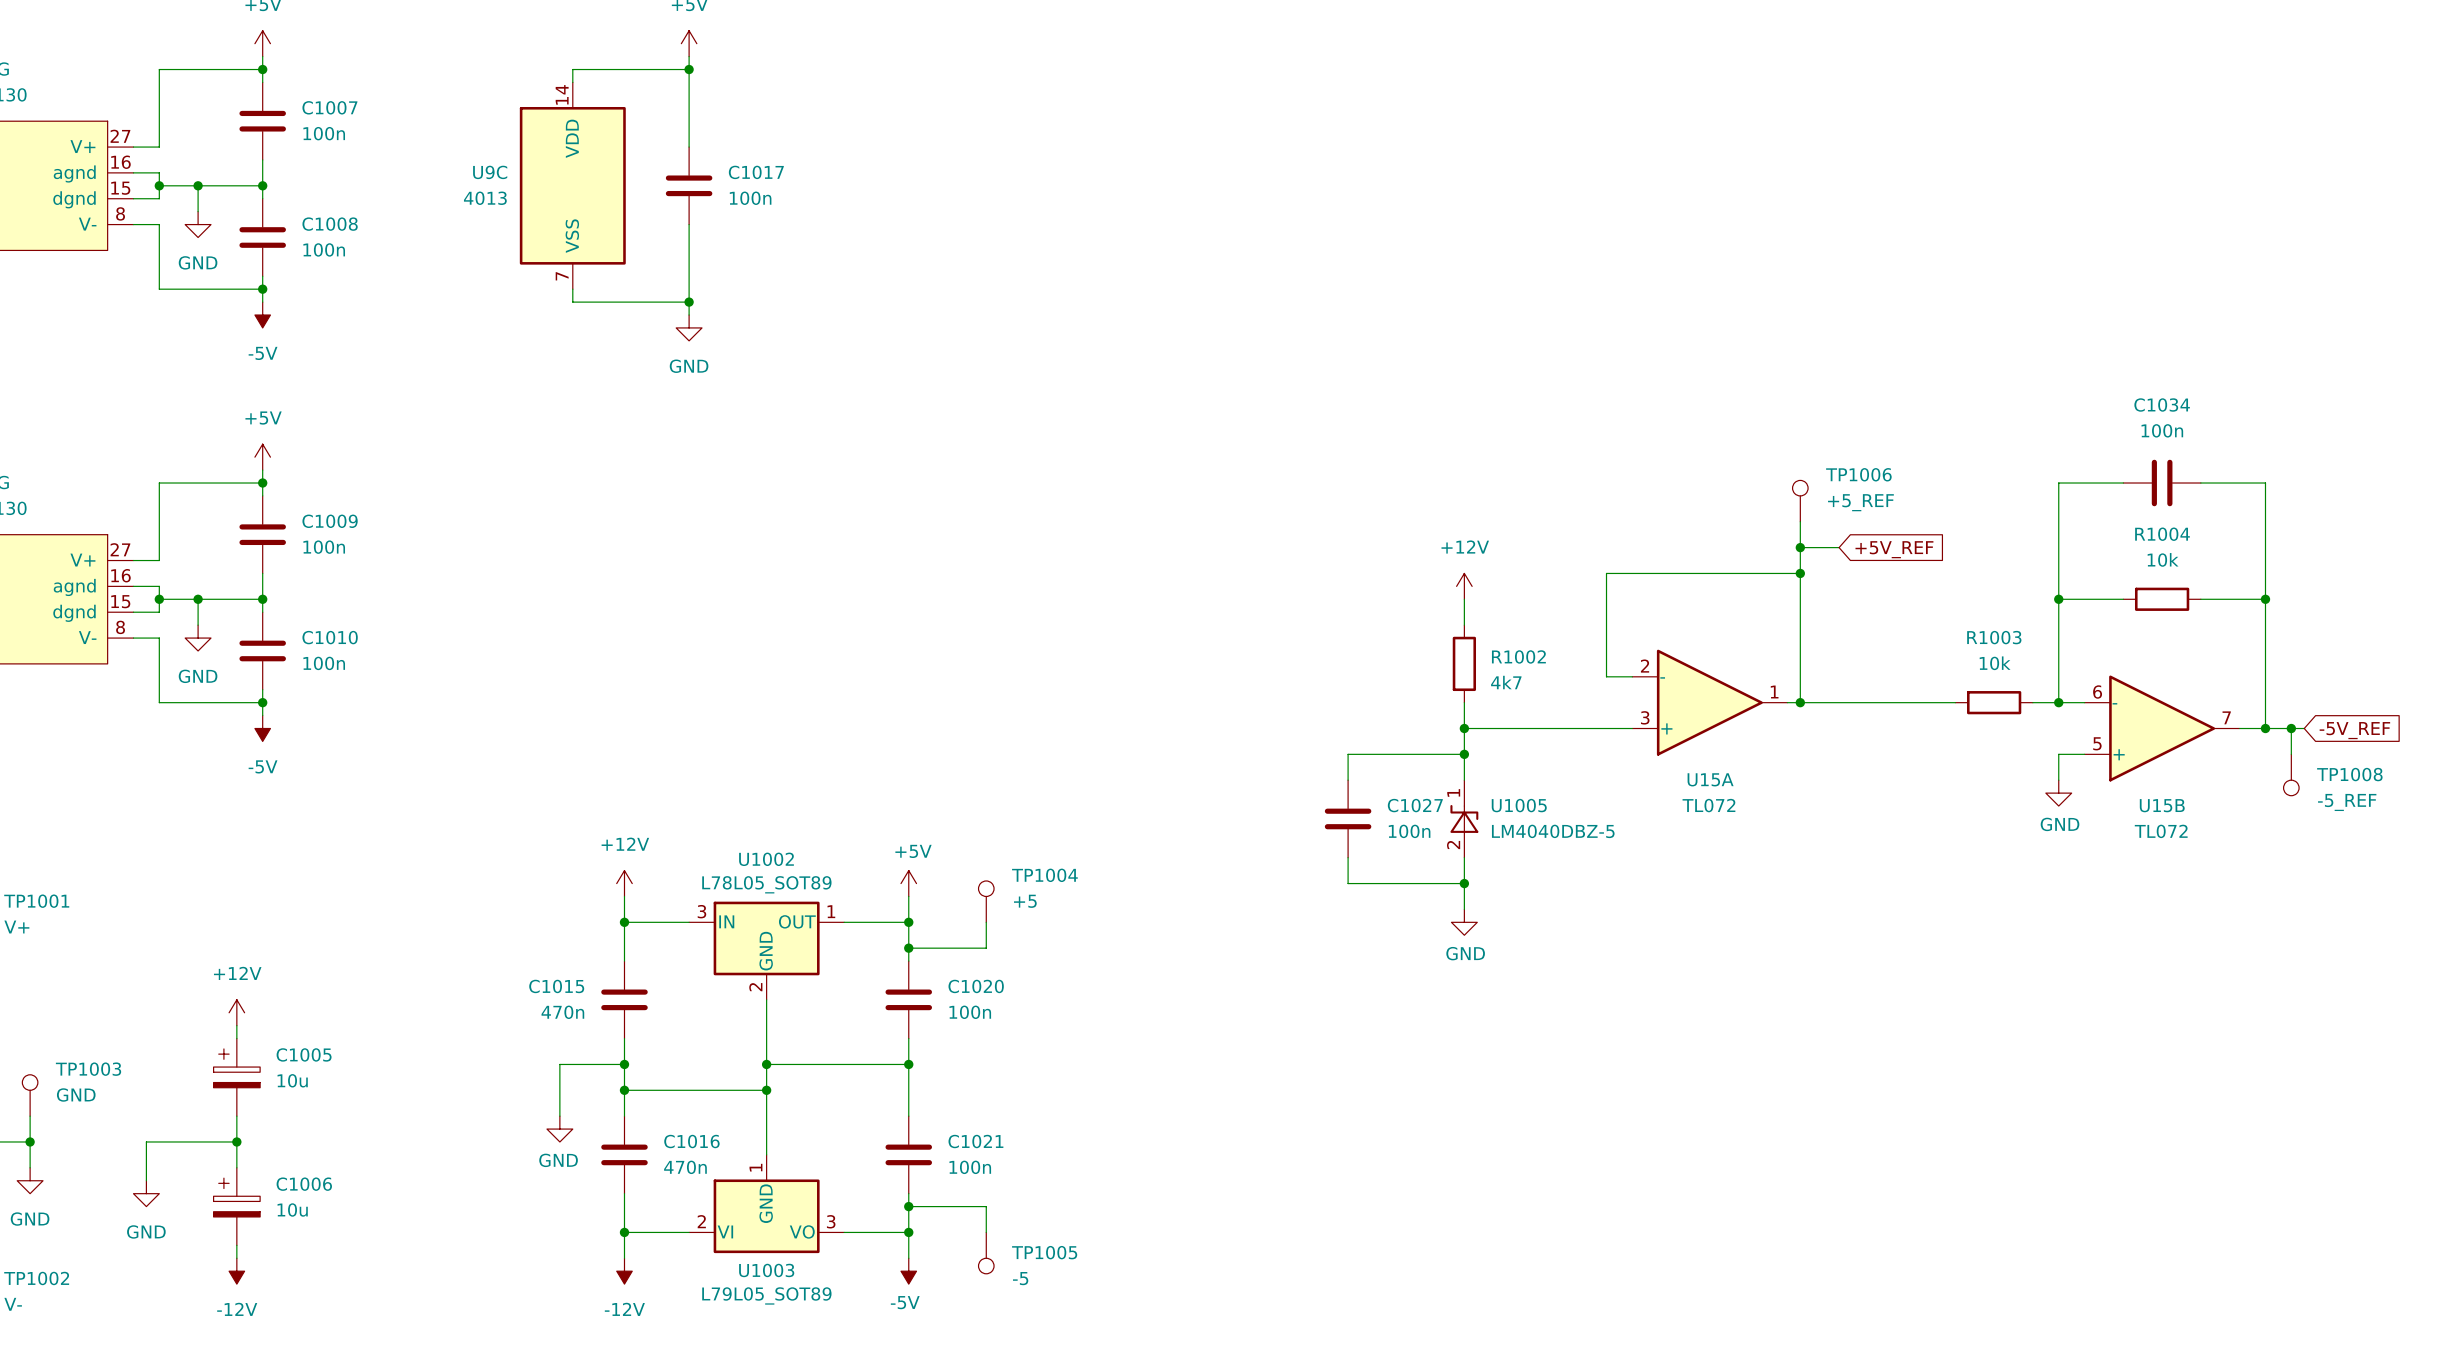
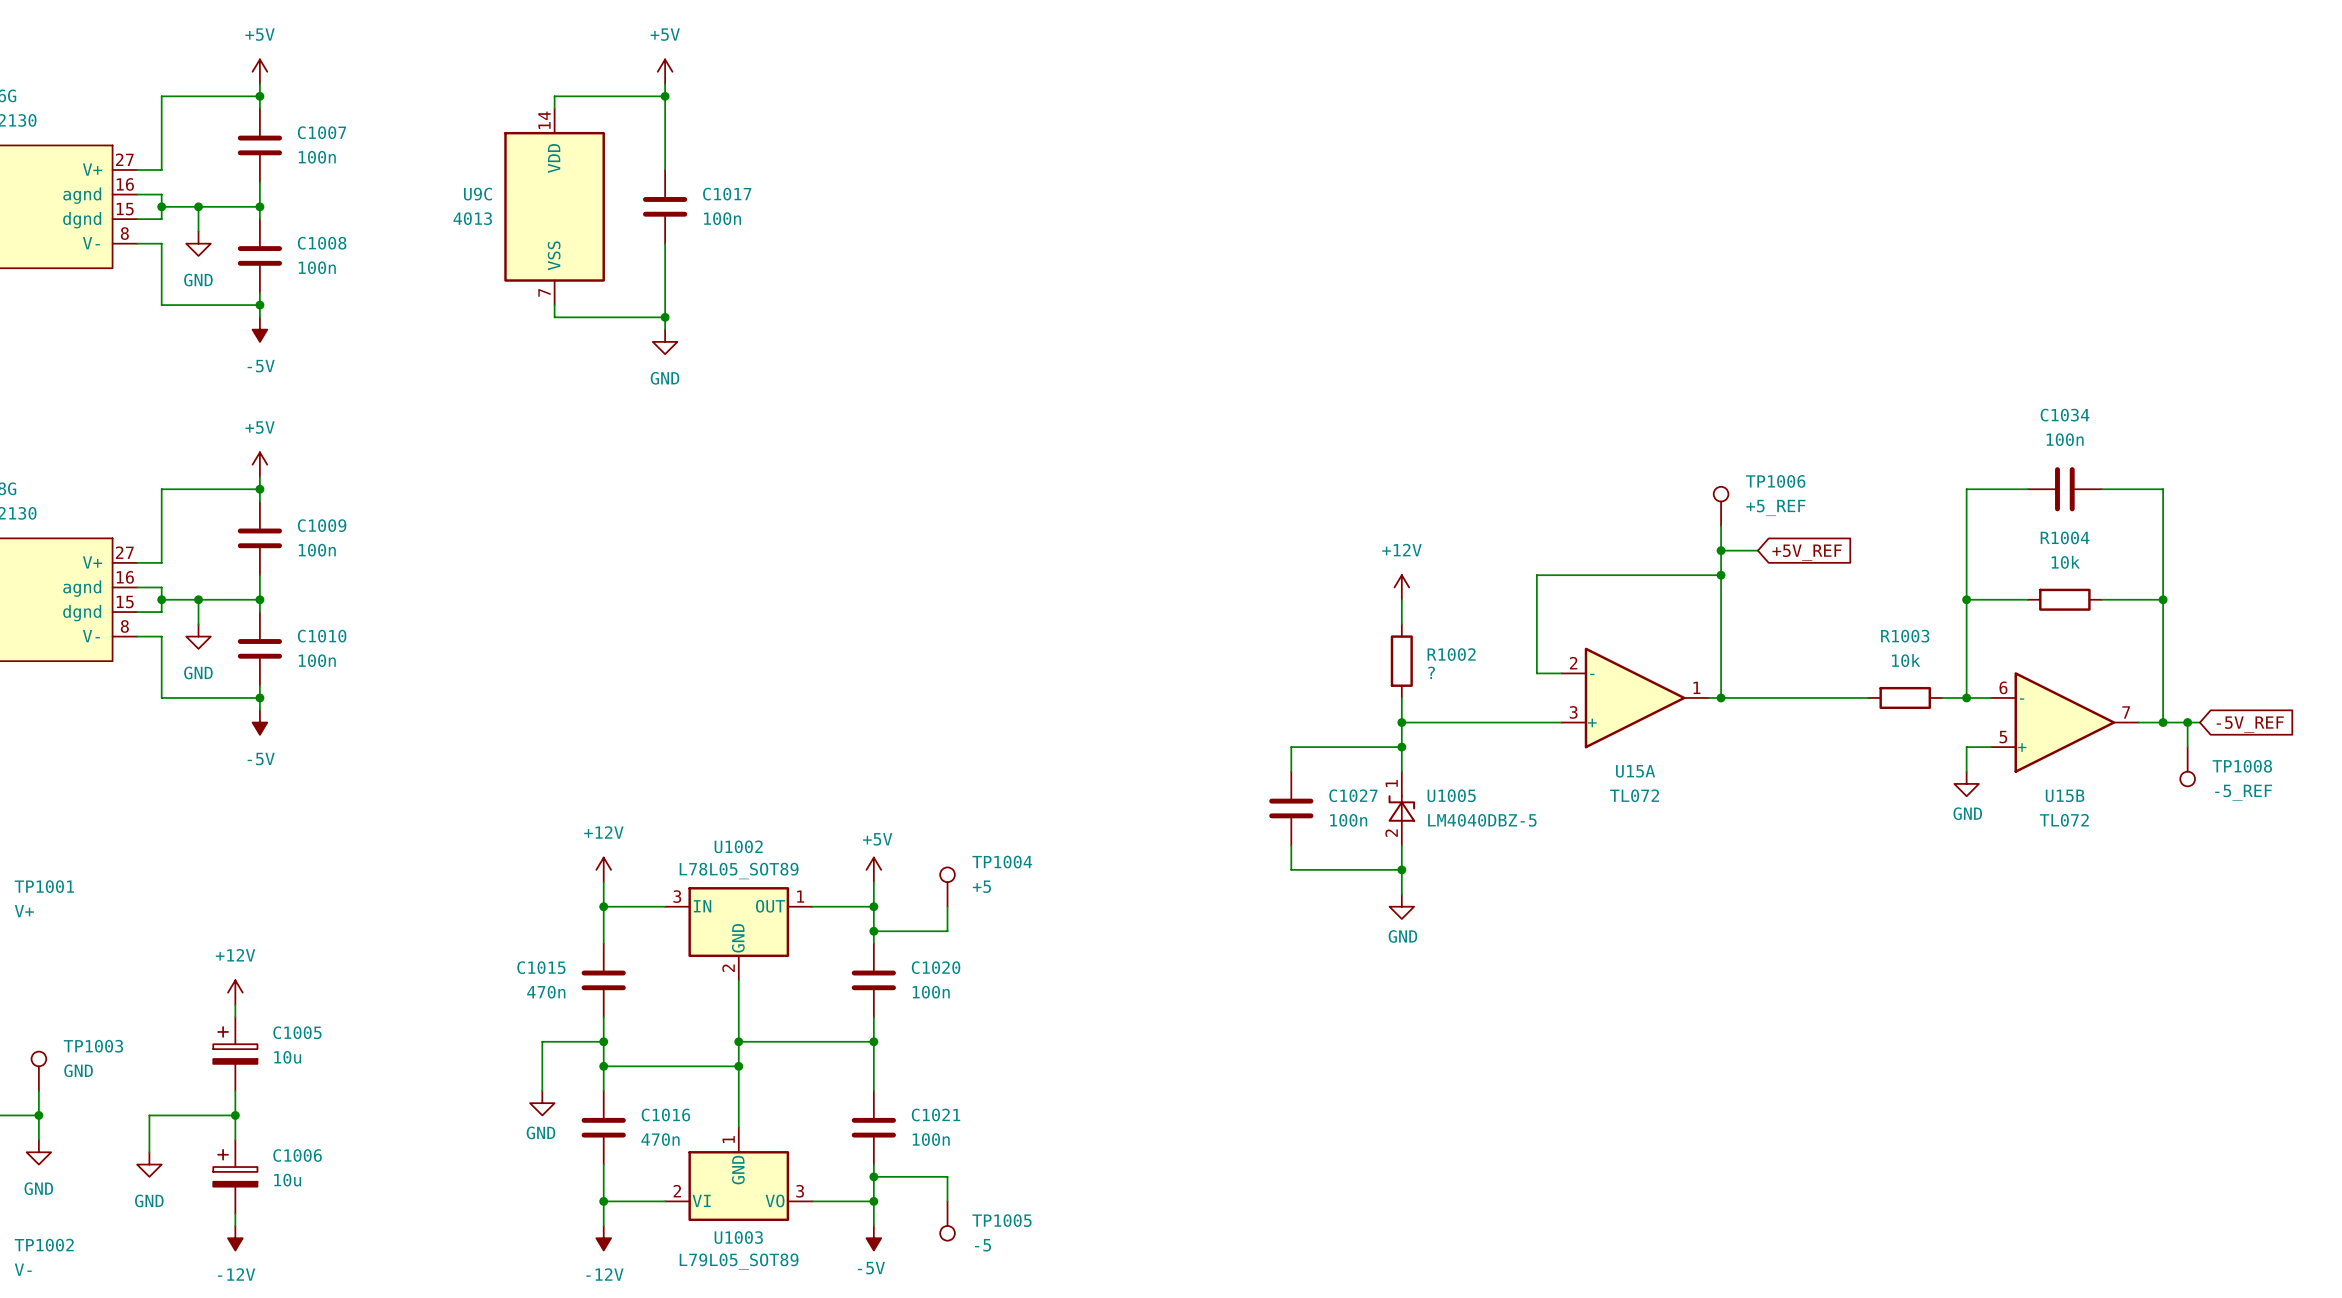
R1002 value: 4k7 (1506, 682) -> ? (1431, 672)

